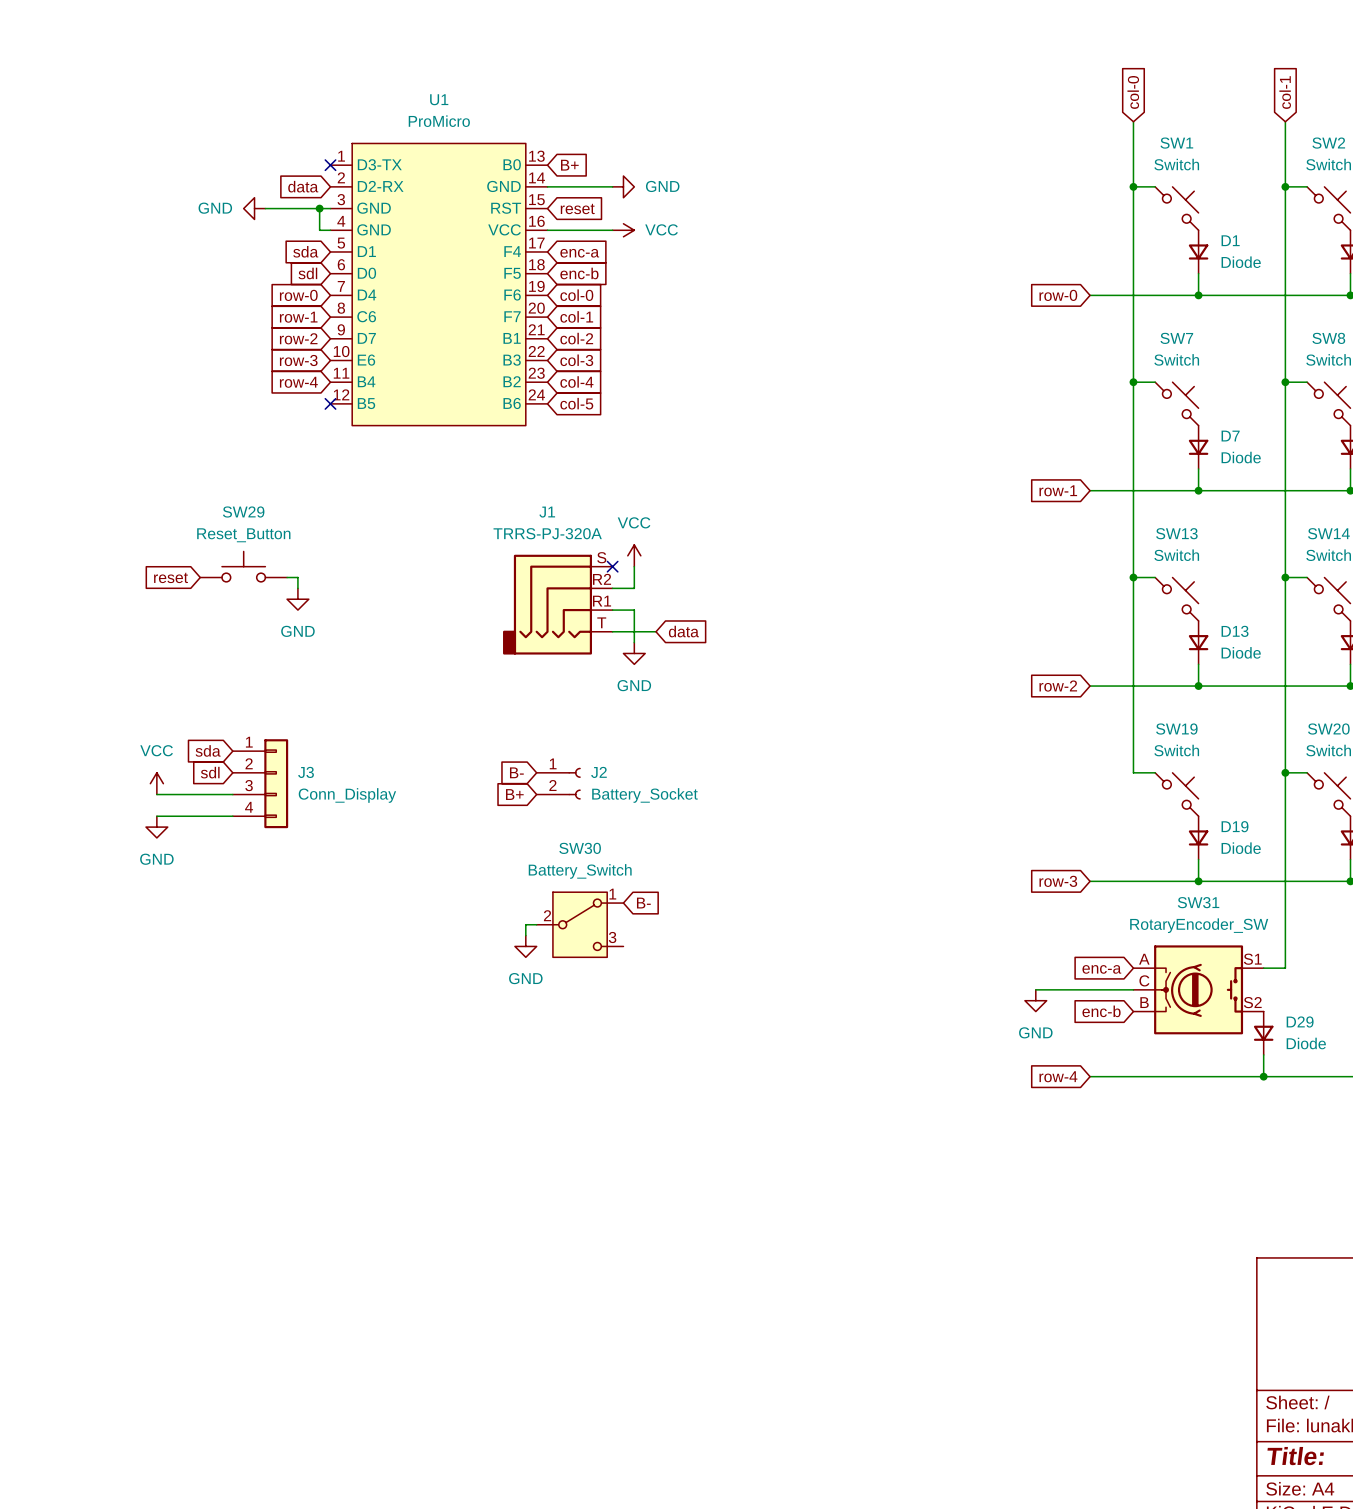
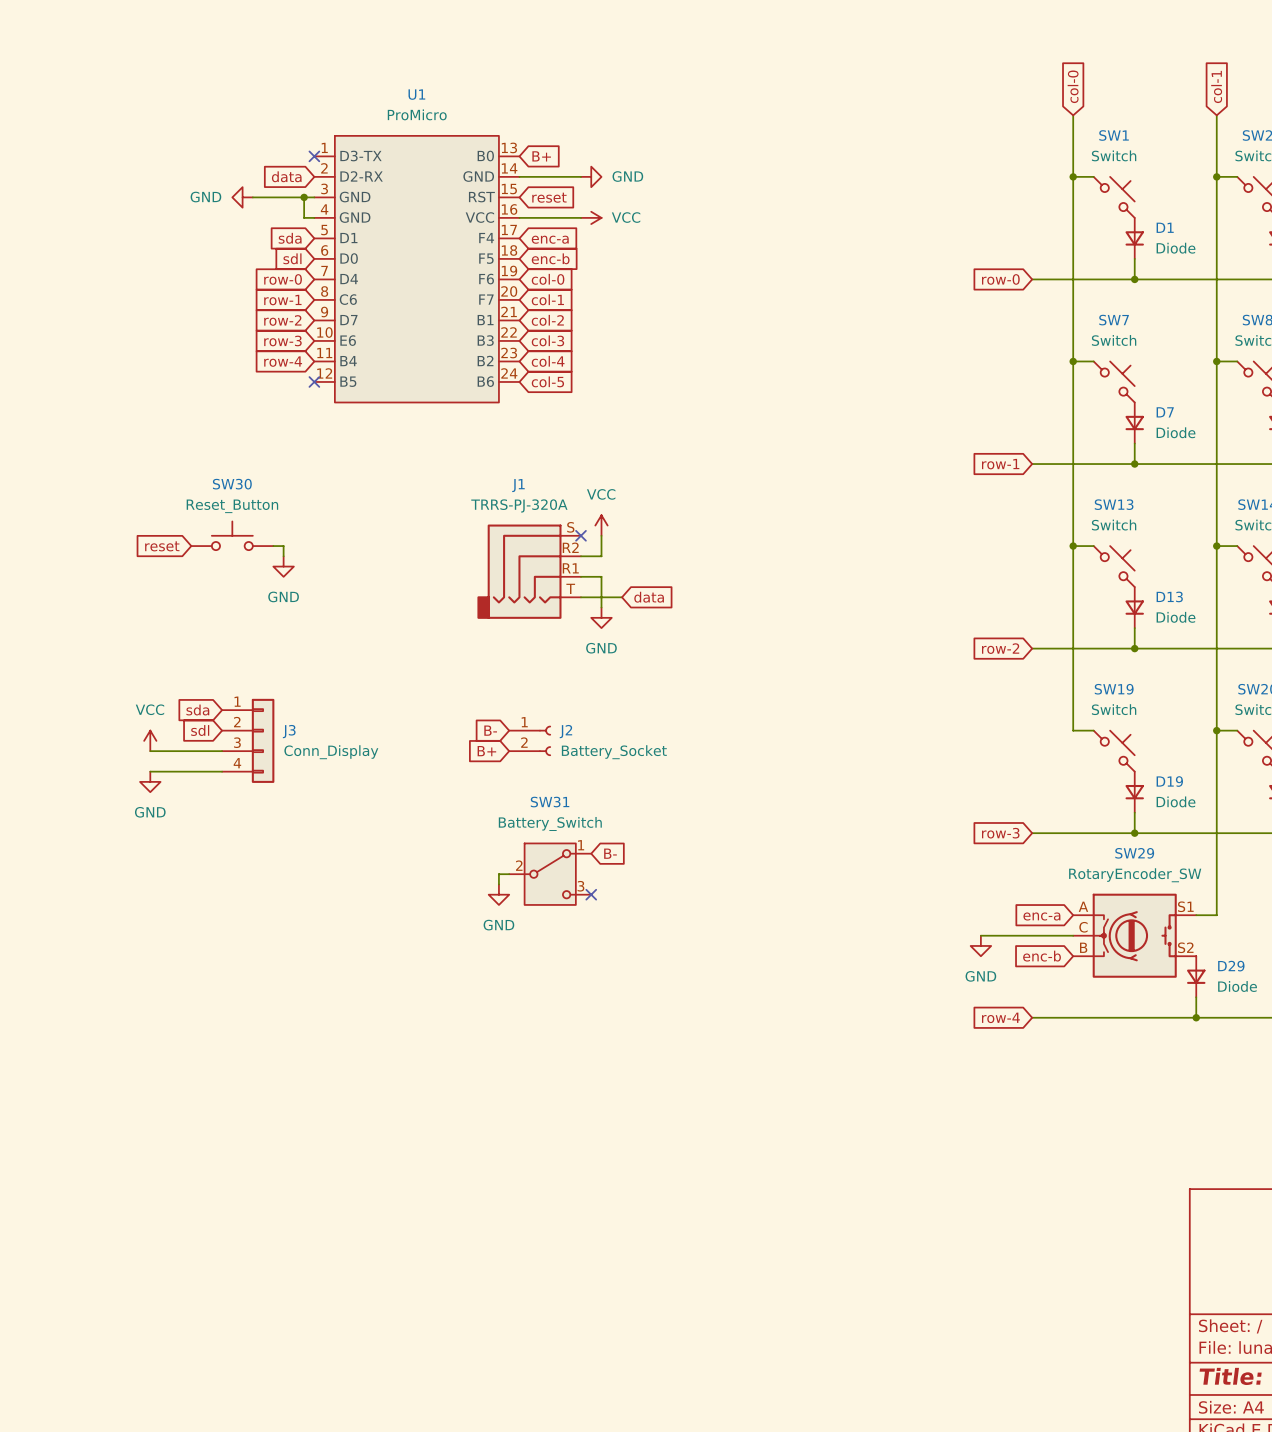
SW29 name: SW29 (243, 512) -> SW30 (232, 484)
SW30 name: SW30 (580, 848) -> SW31 (550, 802)
SW31 name: SW31 (1198, 902) -> SW29 (1134, 853)
no-connect mark: none -> (591, 894)

